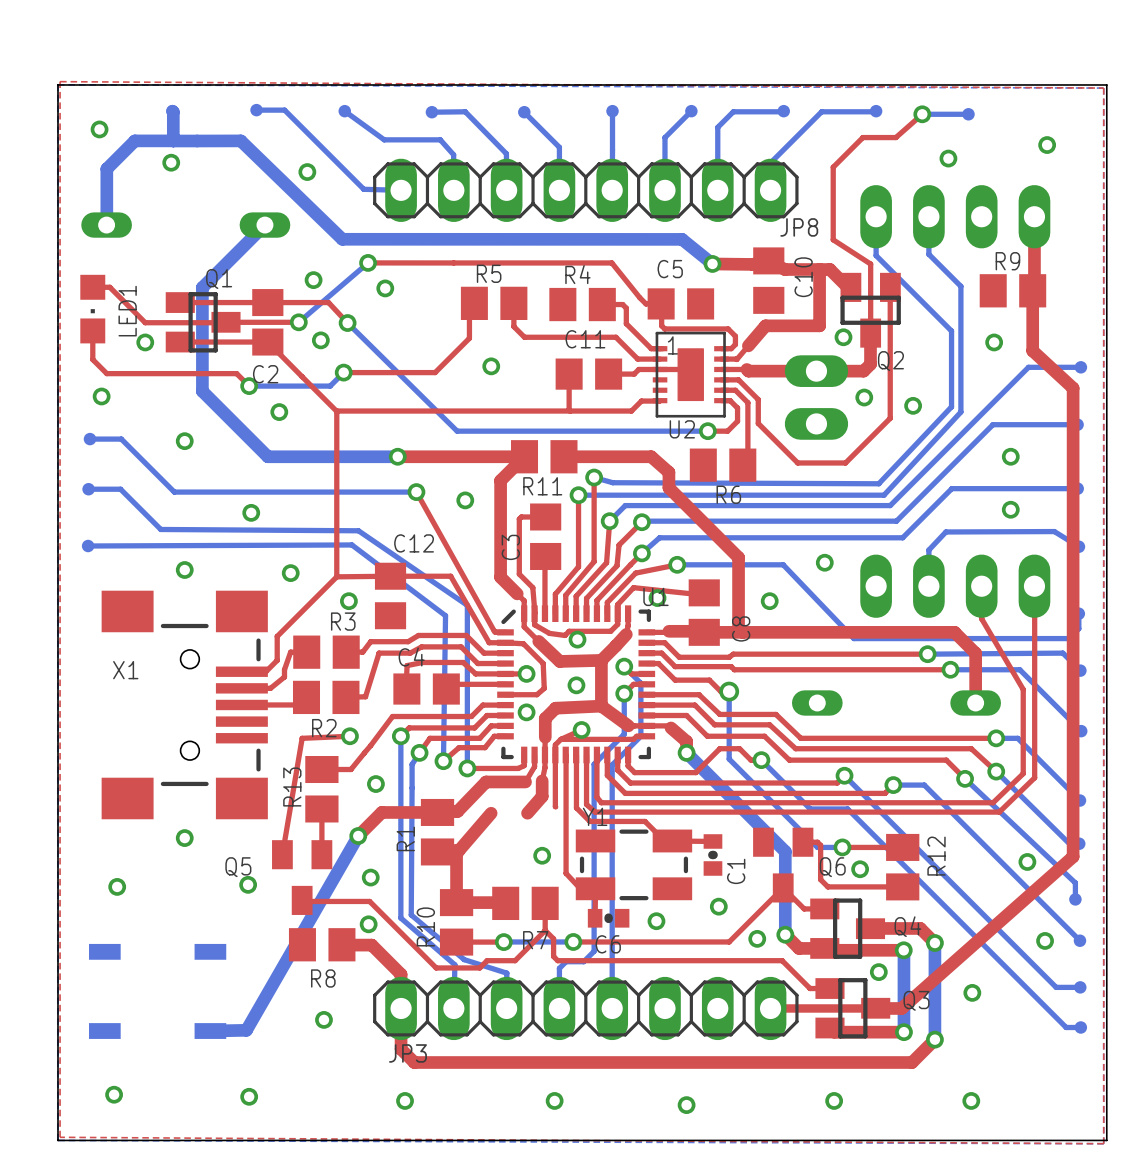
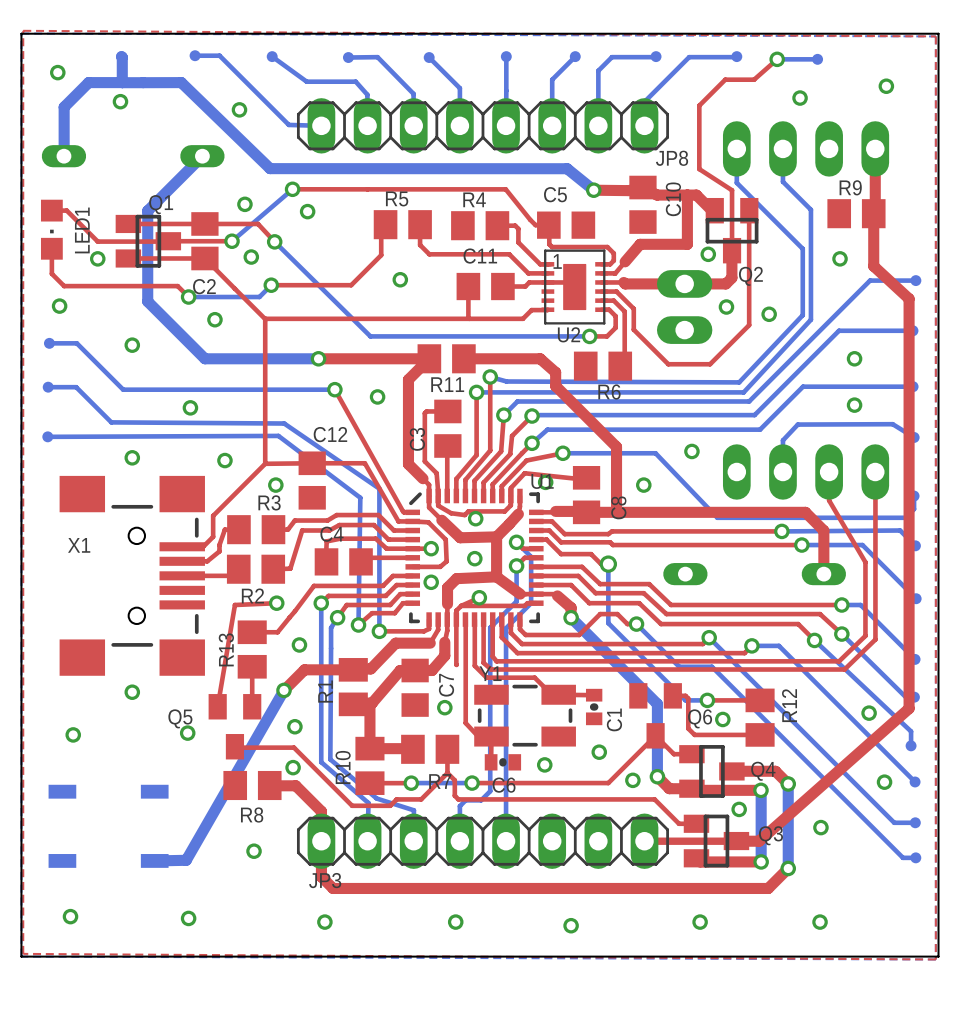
C7: none -> (415, 687)

